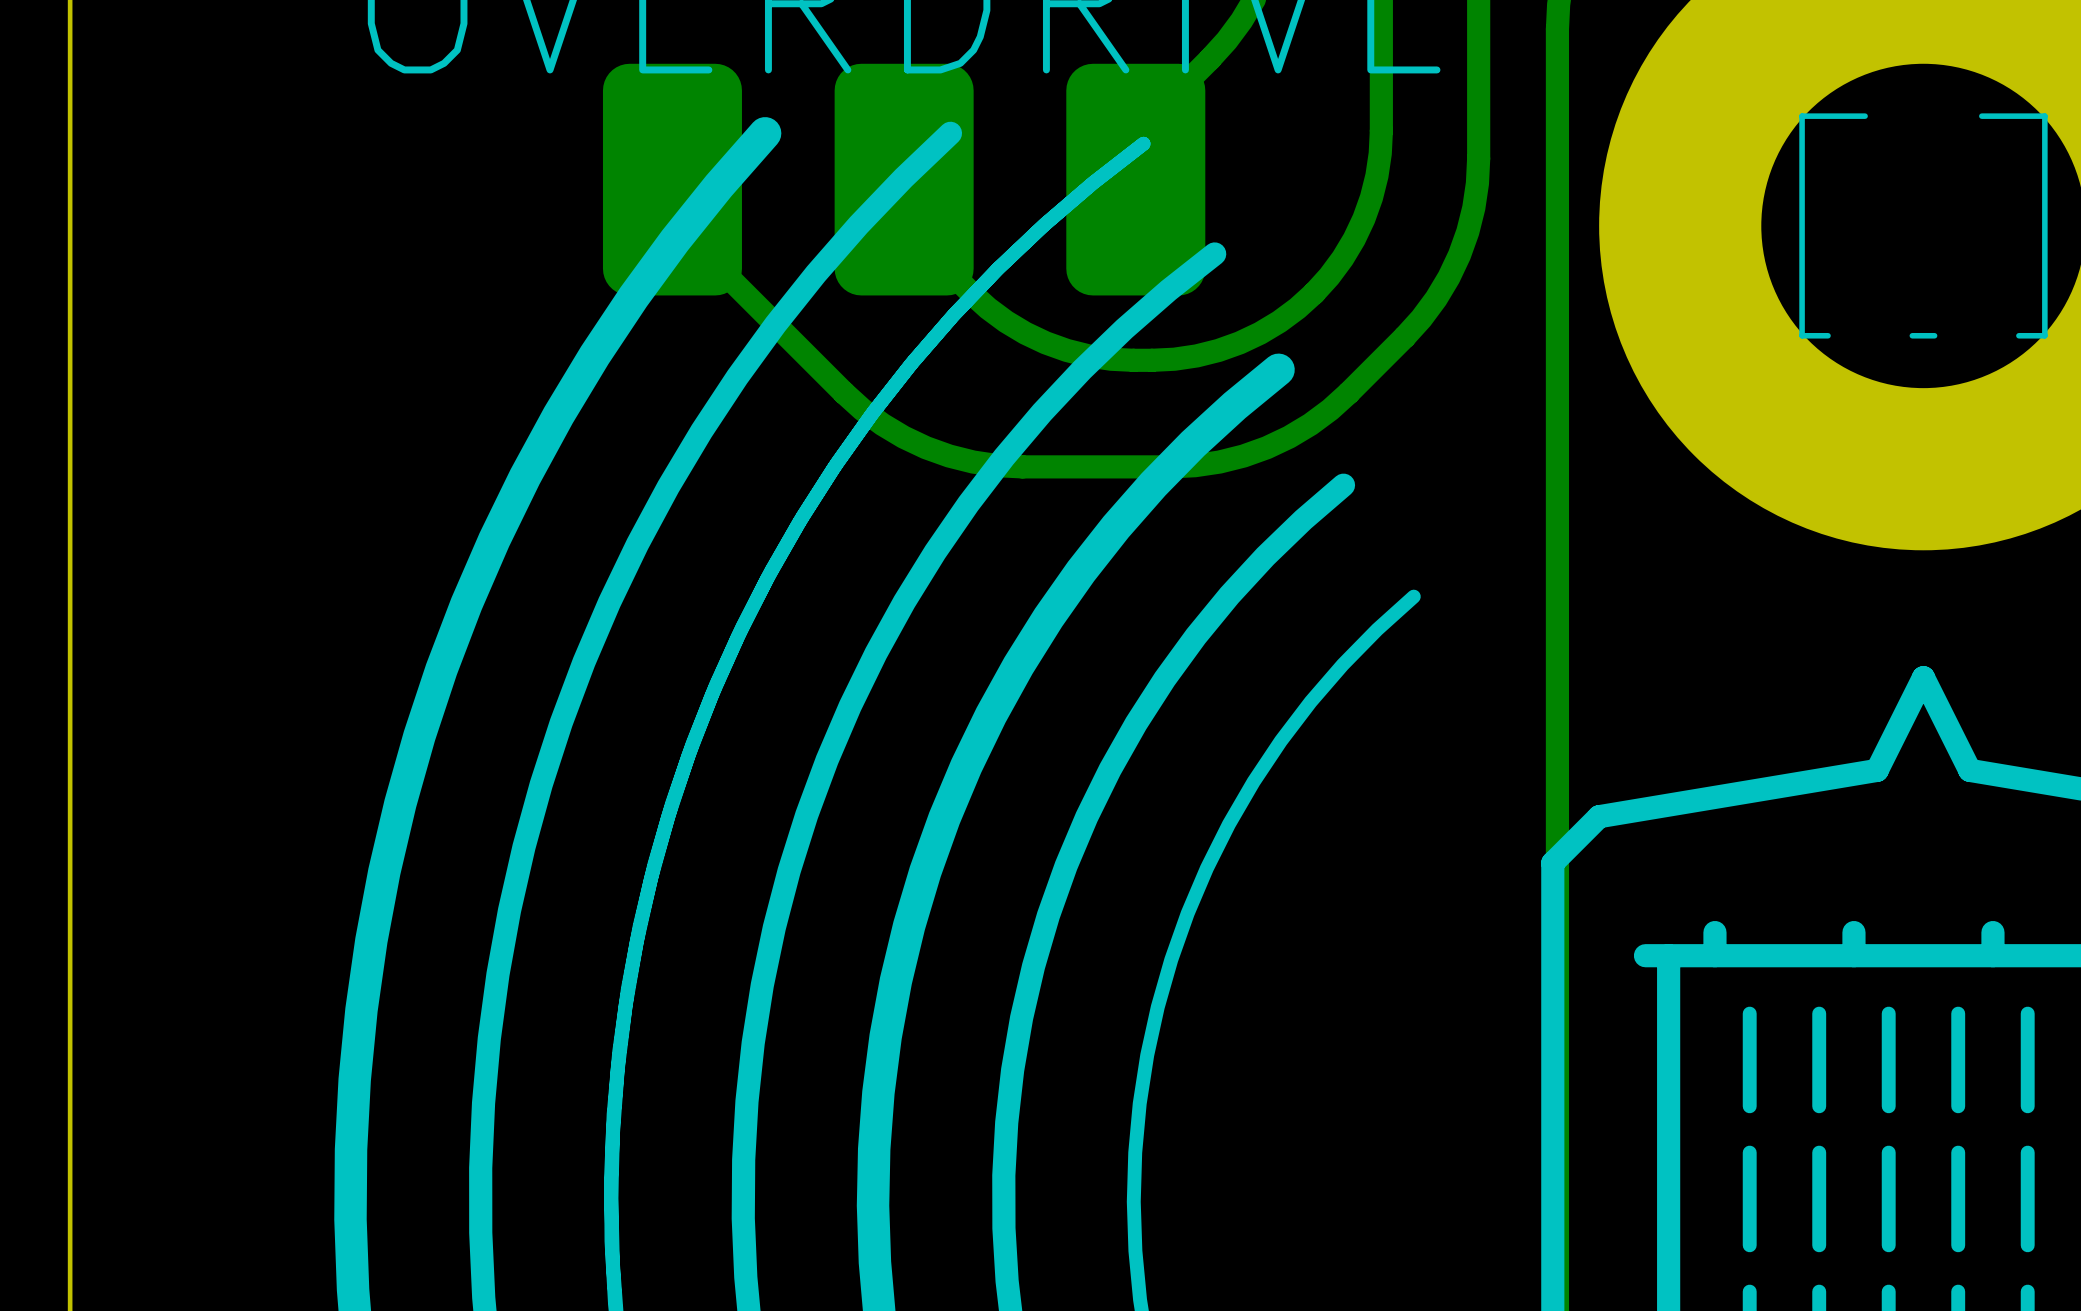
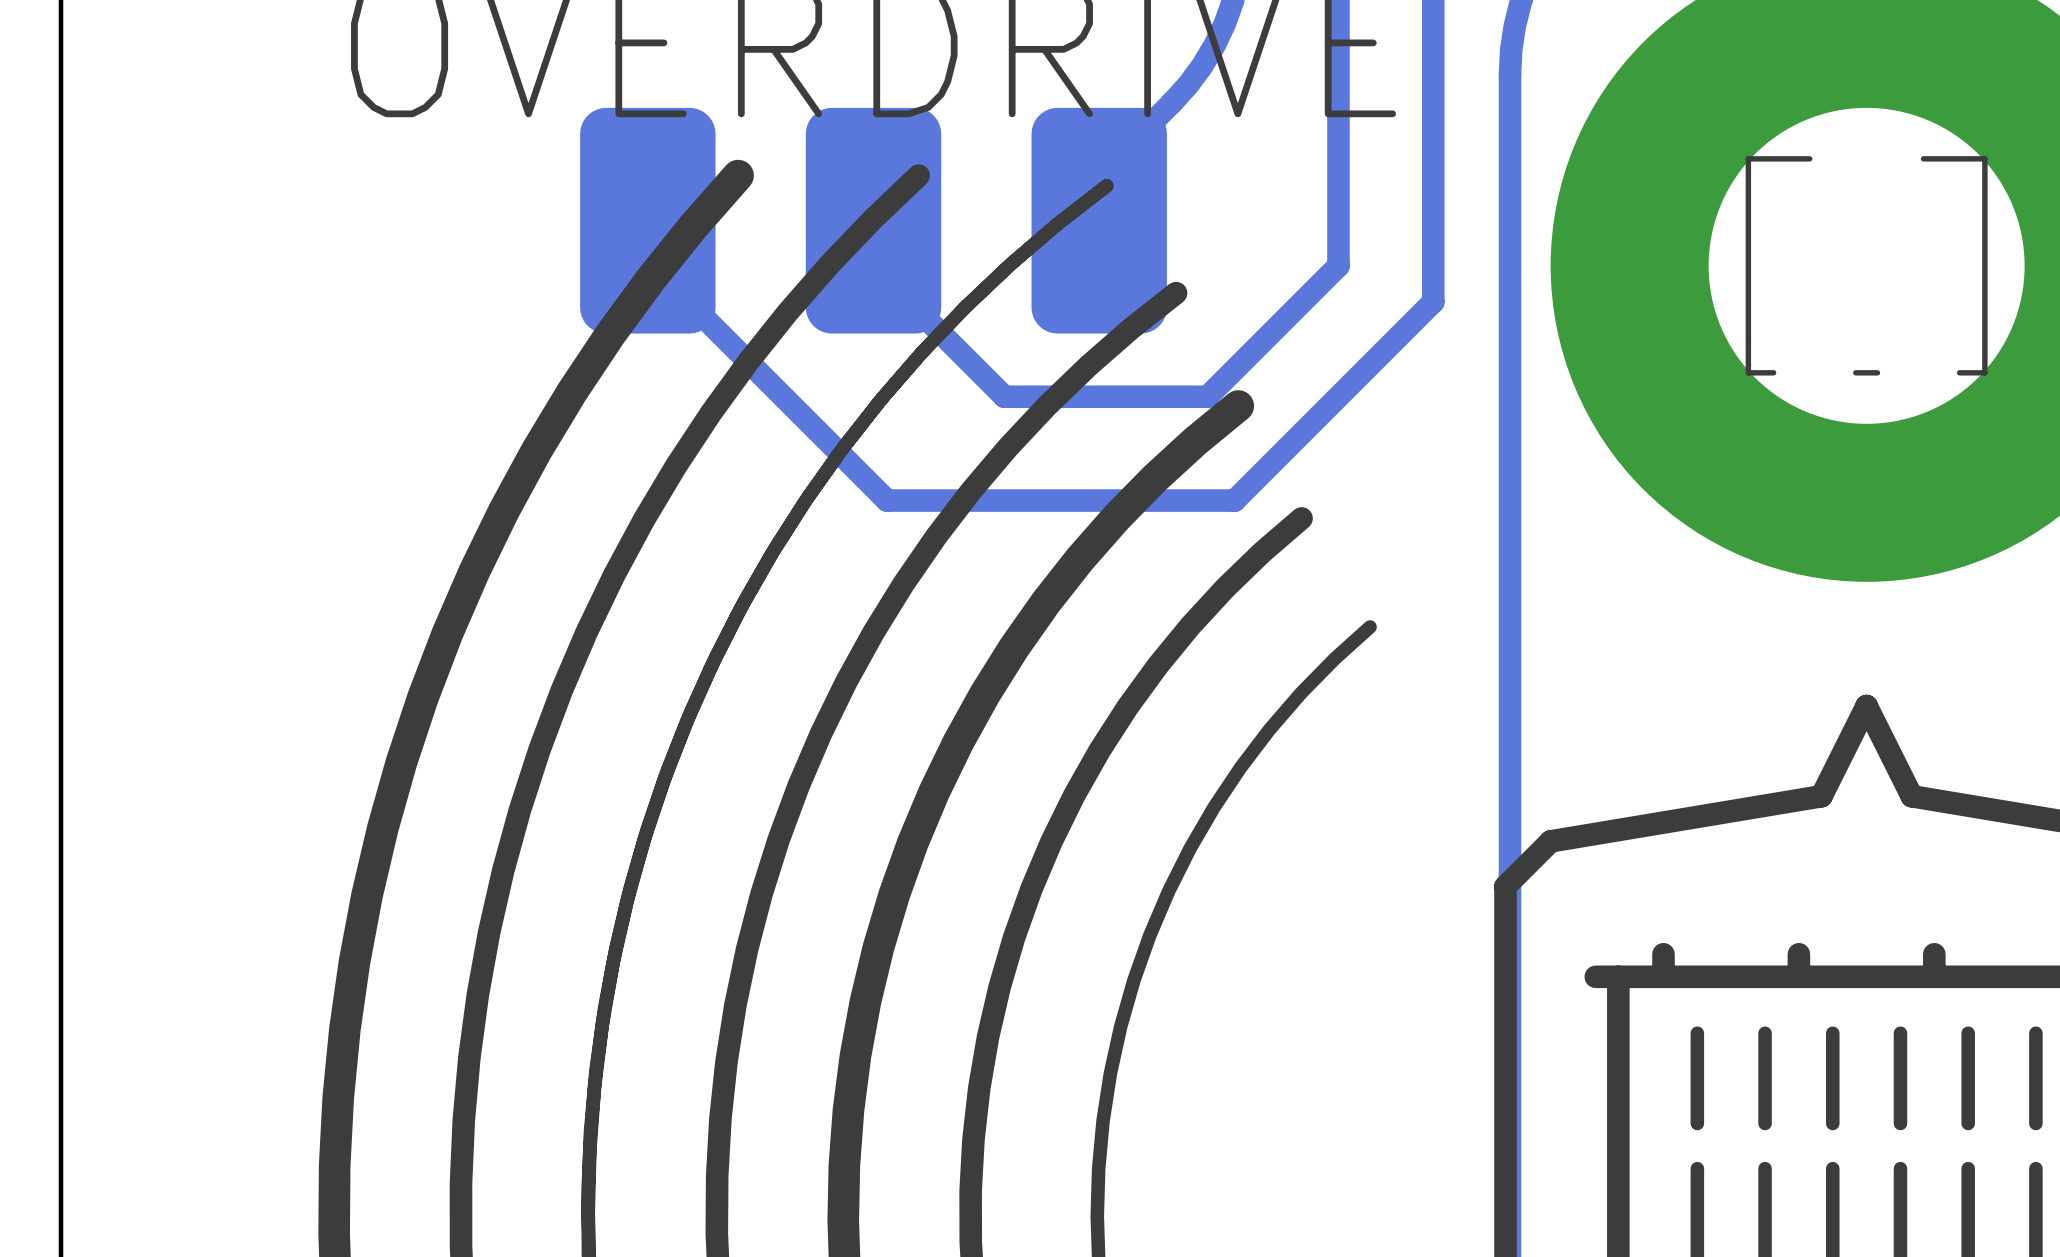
bottom track: (1381, 130) (1376, 175) (1363, 218) (1342, 258) (1314, 293) (1279, 321) (1239, 342) (1196, 355) (1151, 360) -> (1338, 173) (1338, 265) (1207, 396) (1115, 396)
bottom track: (1478, 158) (1473, 207) (1459, 255) (1436, 298) (1404, 336) -> (1433, 200) (1433, 301) (1361, 373)
bottom track: (971, 293) (1006, 321) (1045, 342) (1088, 355) (1133, 360) -> (938, 331) (1004, 396) (1097, 396)
bottom track: (844, 393) (882, 424) (925, 447) (973, 462) (1022, 466) -> (815, 428) (887, 500) (988, 500)
bottom track: (1348, 393) (1310, 424) (1266, 447) (1219, 462) (1170, 466) -> (1306, 428) (1234, 500) (1132, 500)

